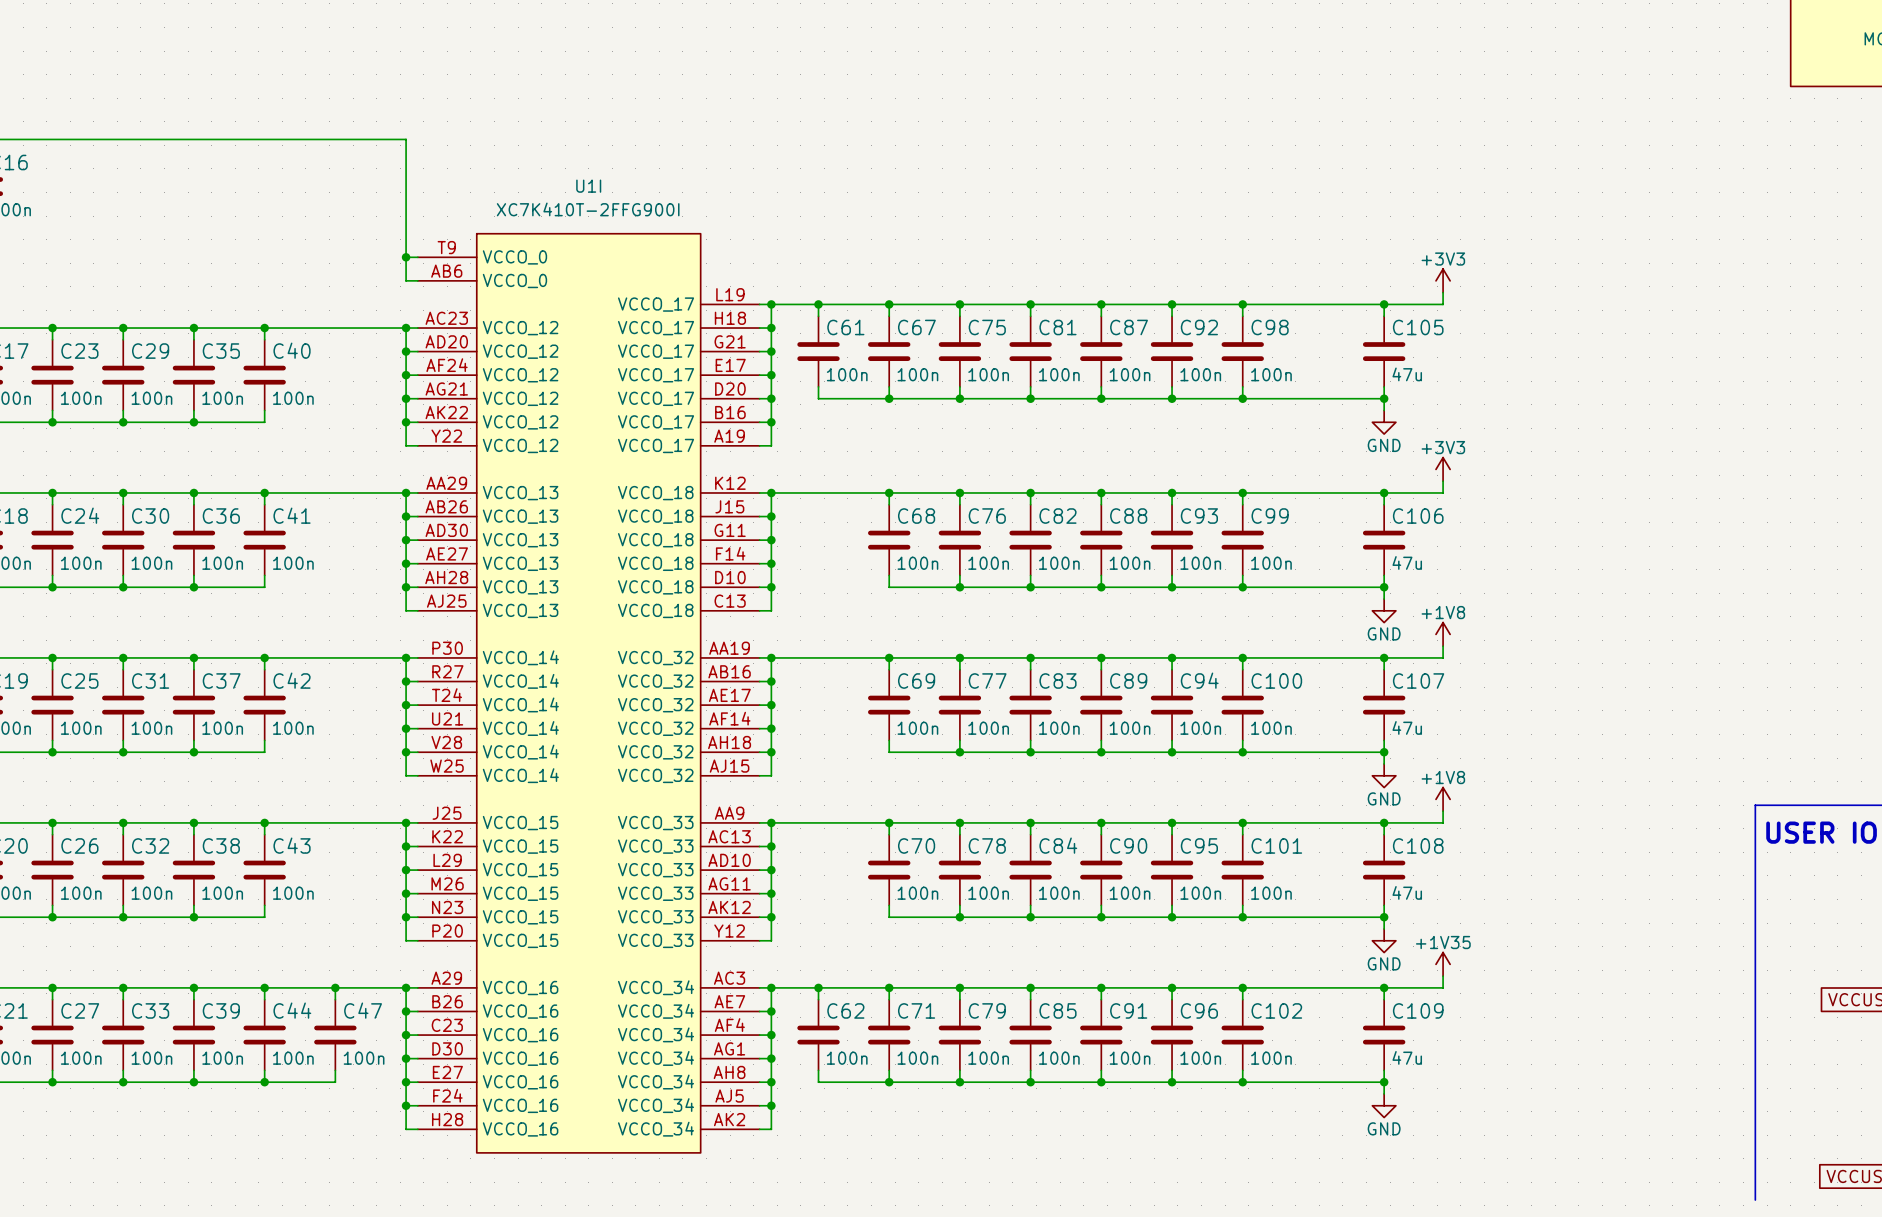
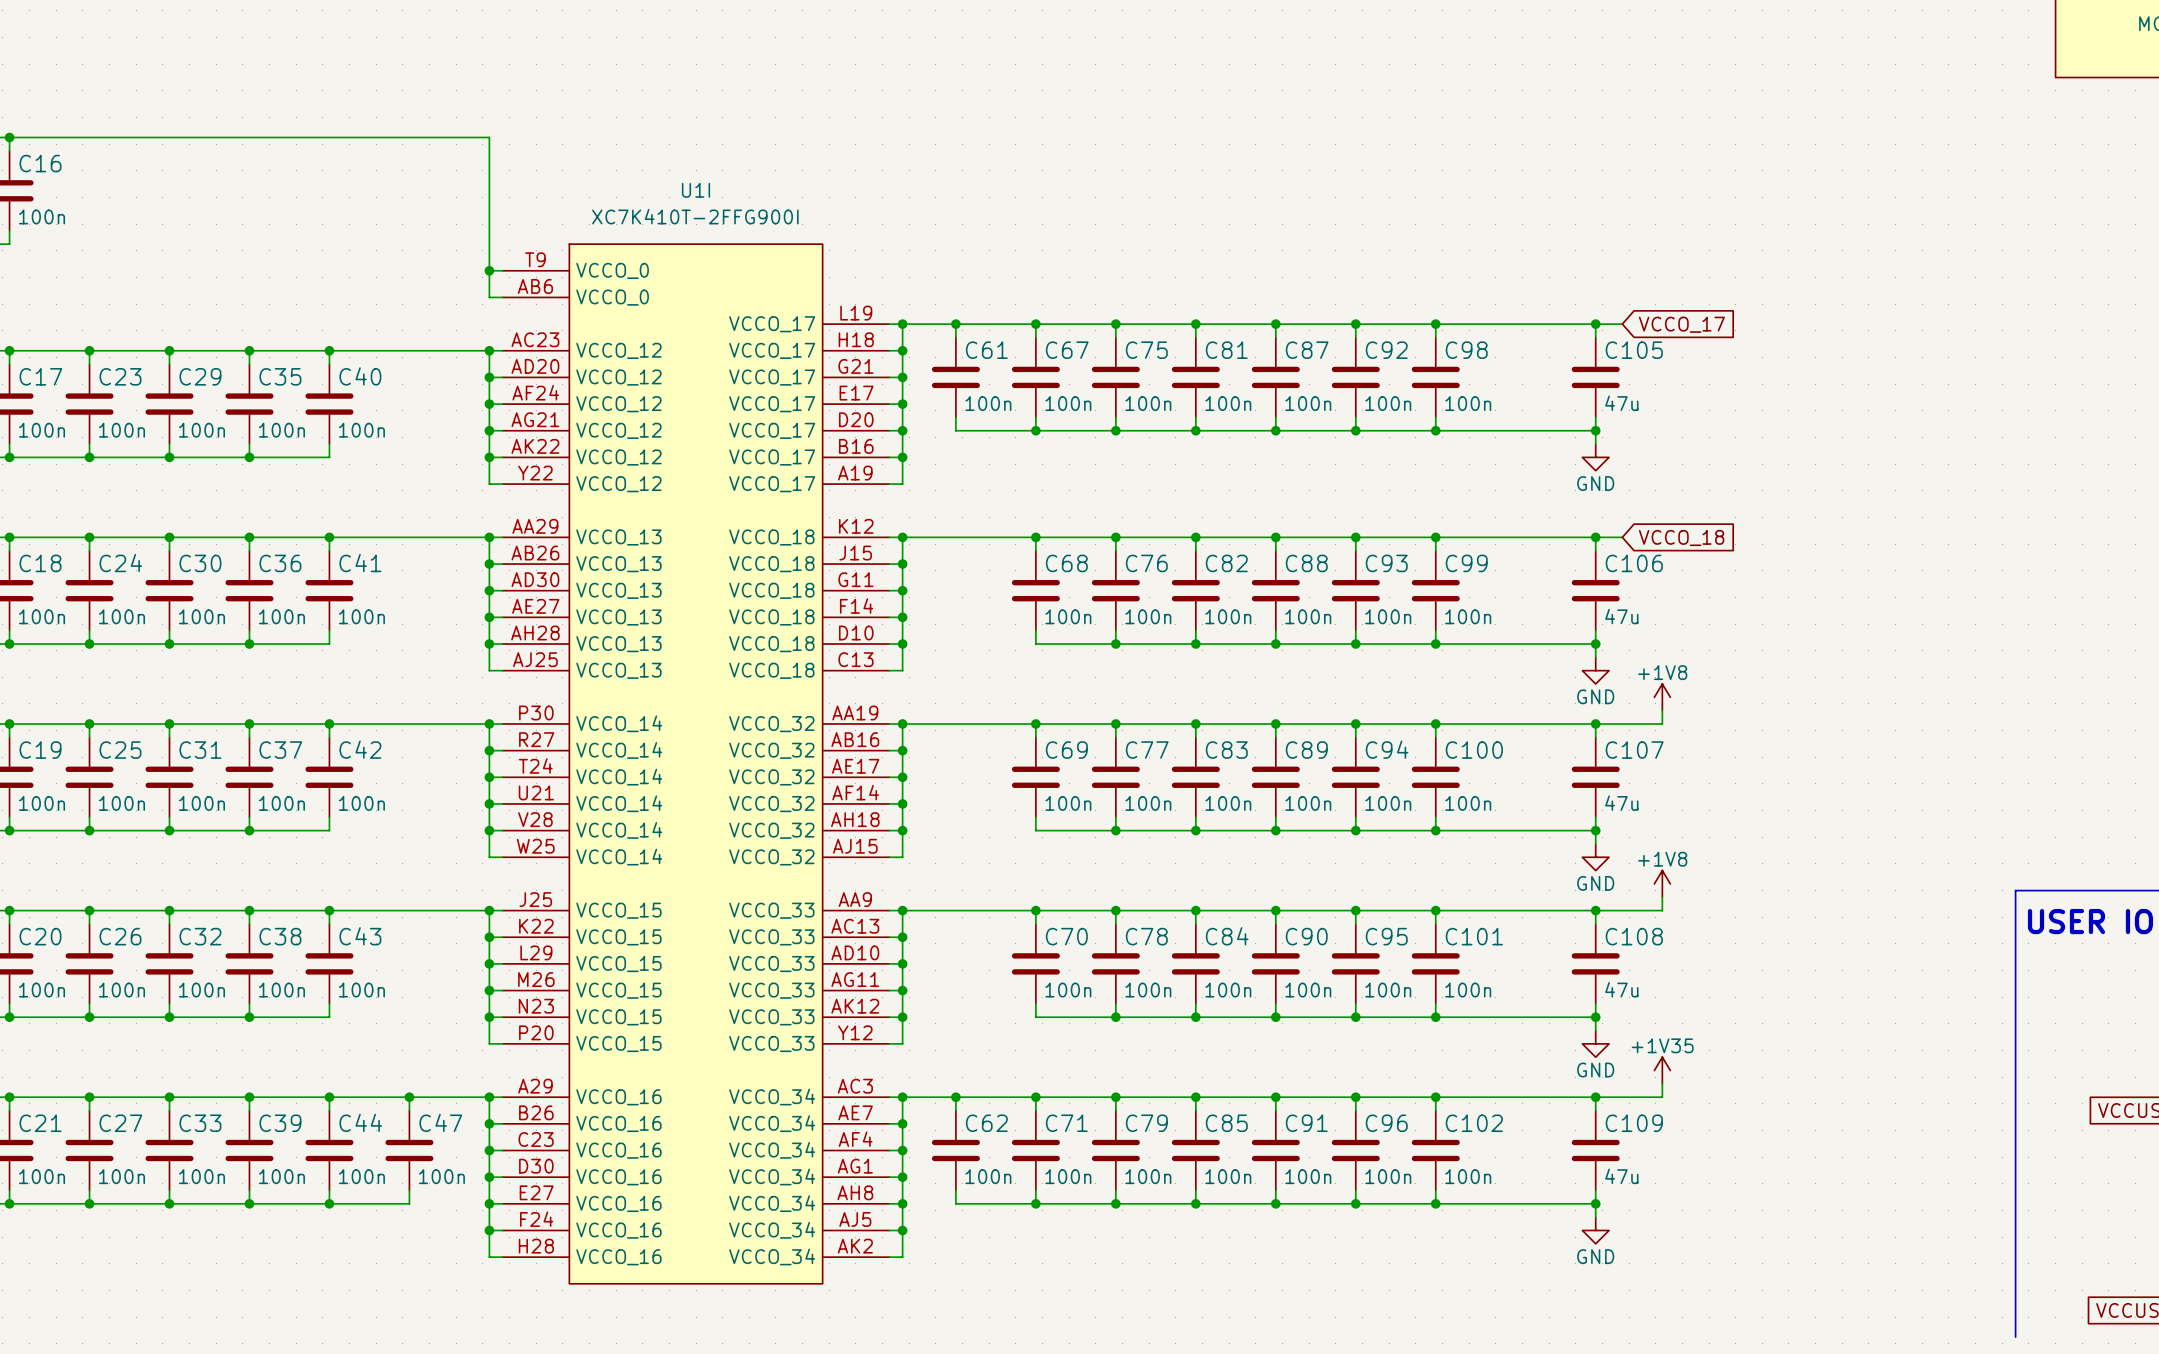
power symbol: +3V3 (1443, 280) -> none
wire: (1443, 292) (1443, 304) (1407, 304) -> none
global label: none -> VCCO_17 (1681, 324)
power symbol: +3V3 (1443, 469) -> none
wire: (1443, 481) (1443, 492) (1407, 492) -> none
global label: none -> VCCO_18 (1681, 538)

